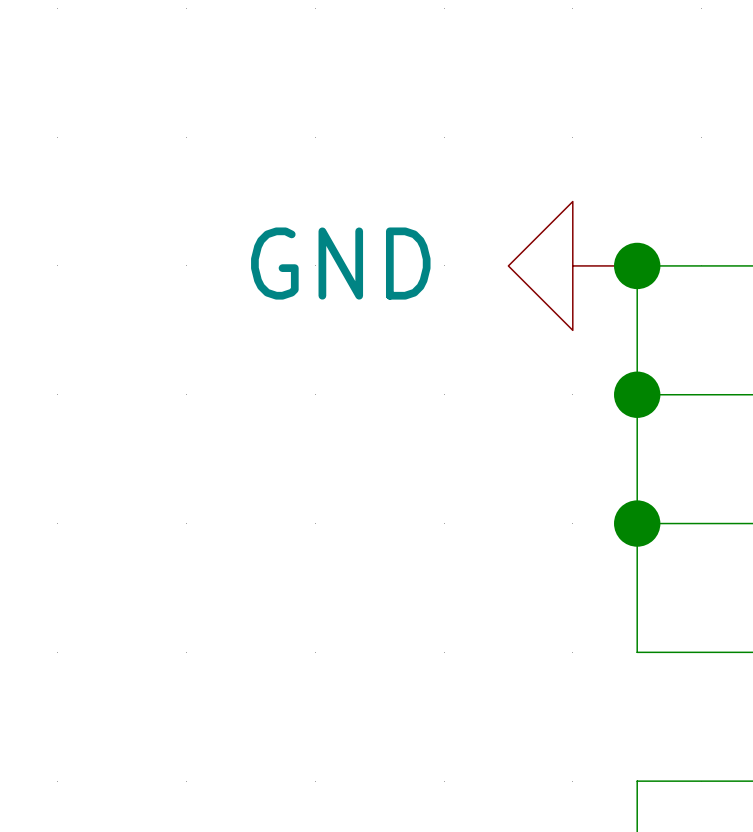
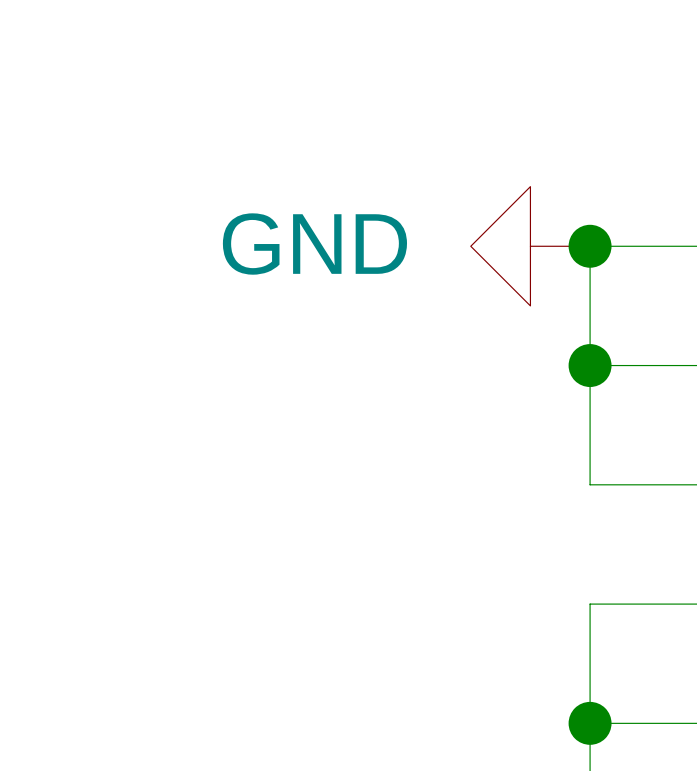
wire: (637, 523) (637, 652) -> (590, 723) (590, 604)
junction position: (637, 523) -> (590, 723)

